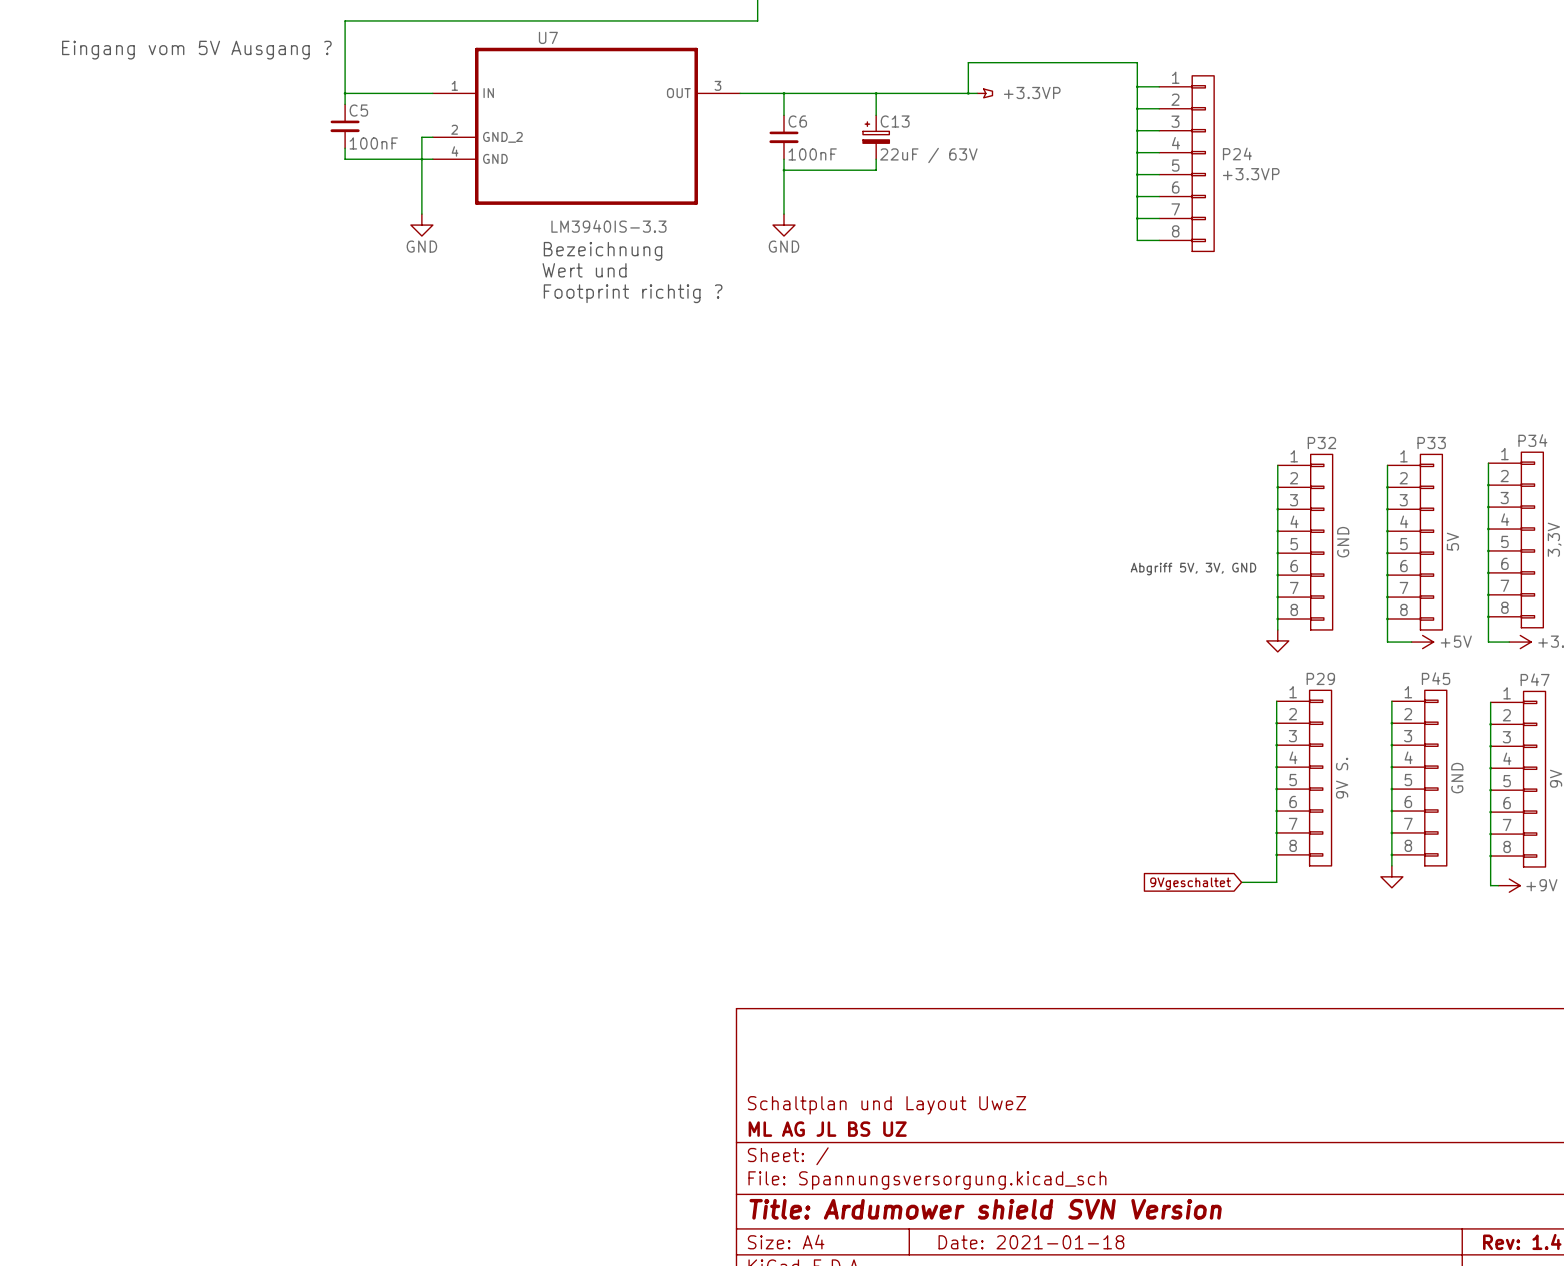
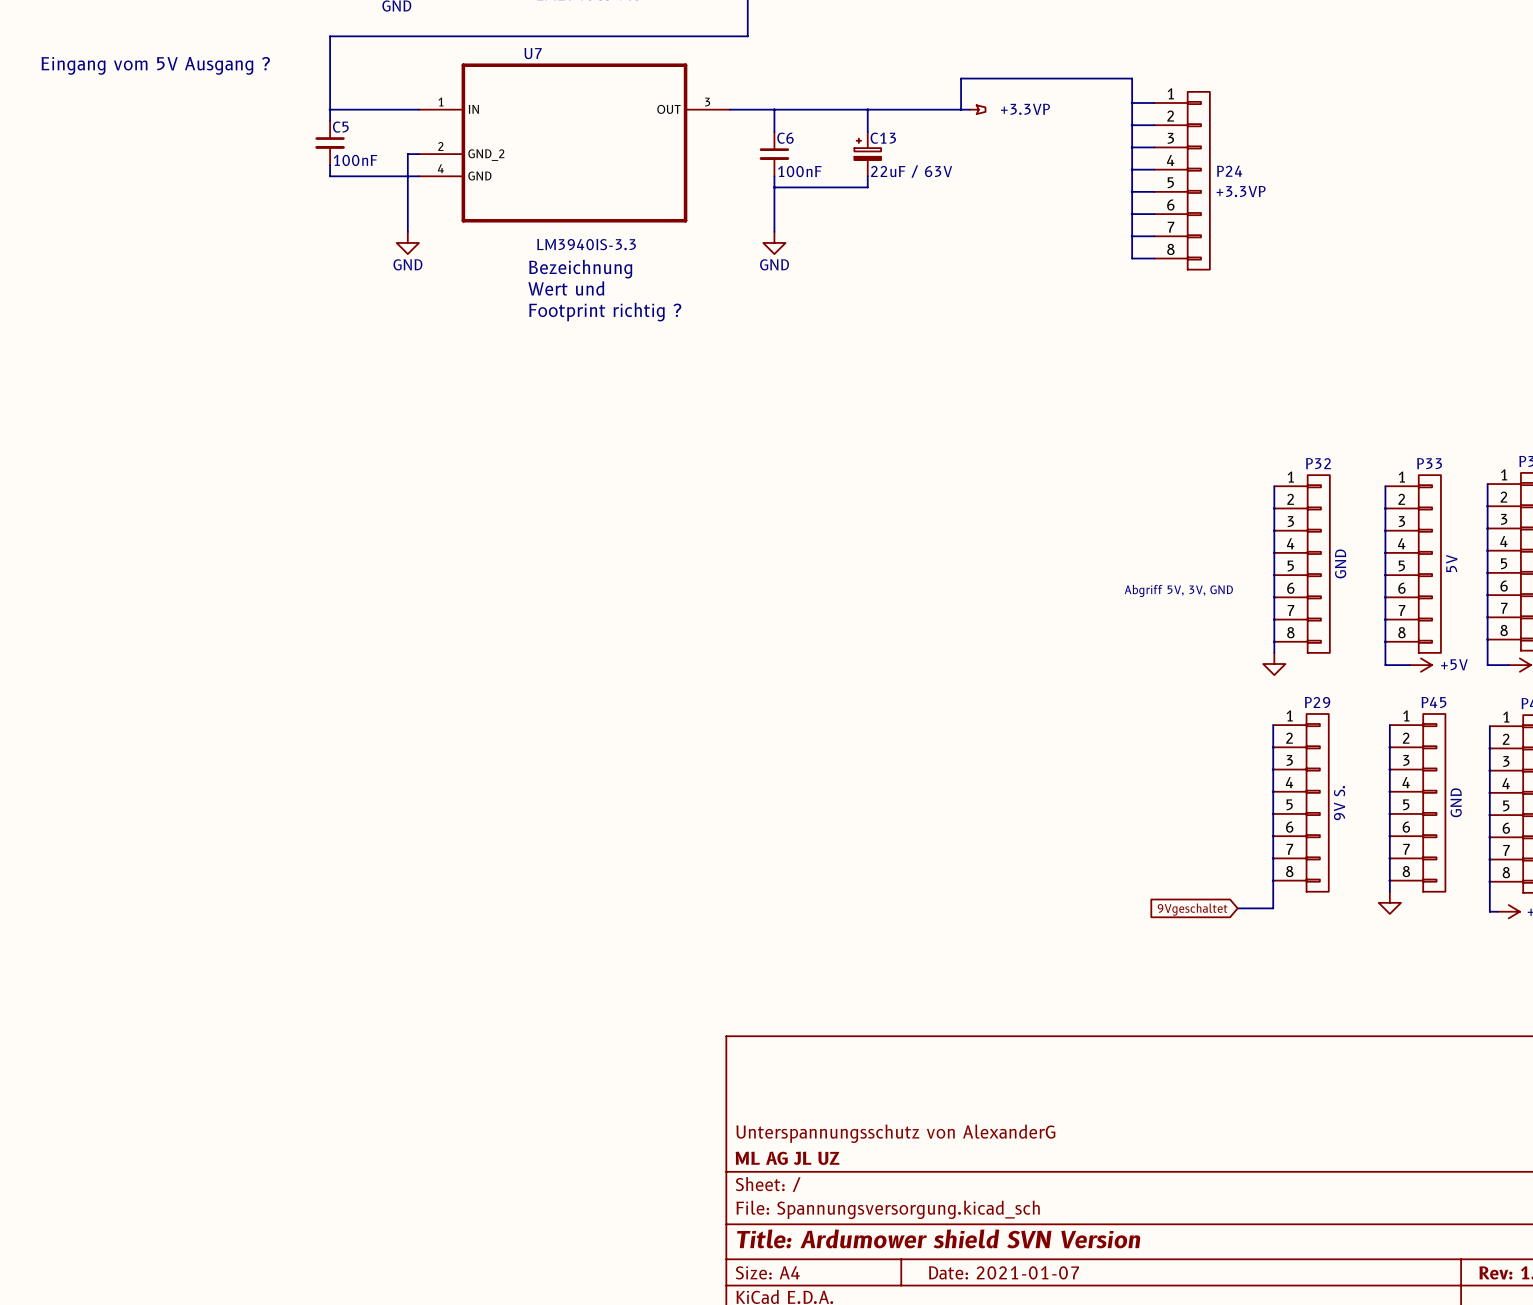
title block: Schaltplan und Layout UweZ (887, 1105) -> Unterspannungsschutz von AlexanderG (895, 1133)
title block: ML AG JL BS UZ (827, 1129) -> ML AG JL UZ (787, 1158)
title block: Date: 2021-01-18 (1031, 1242) -> Date: 2021-01-07 (1003, 1272)

